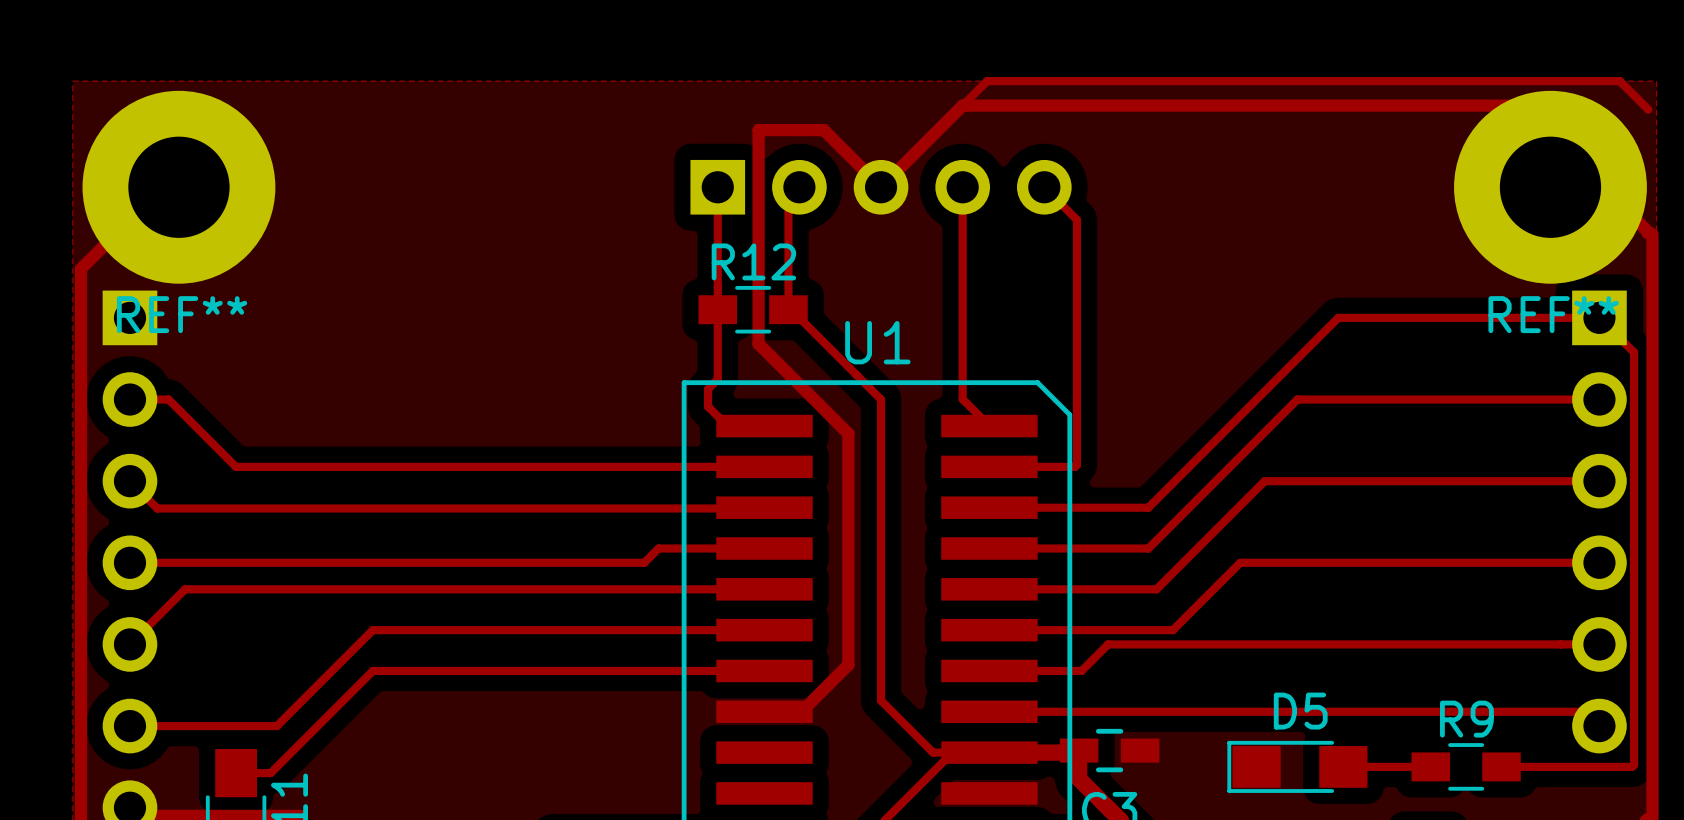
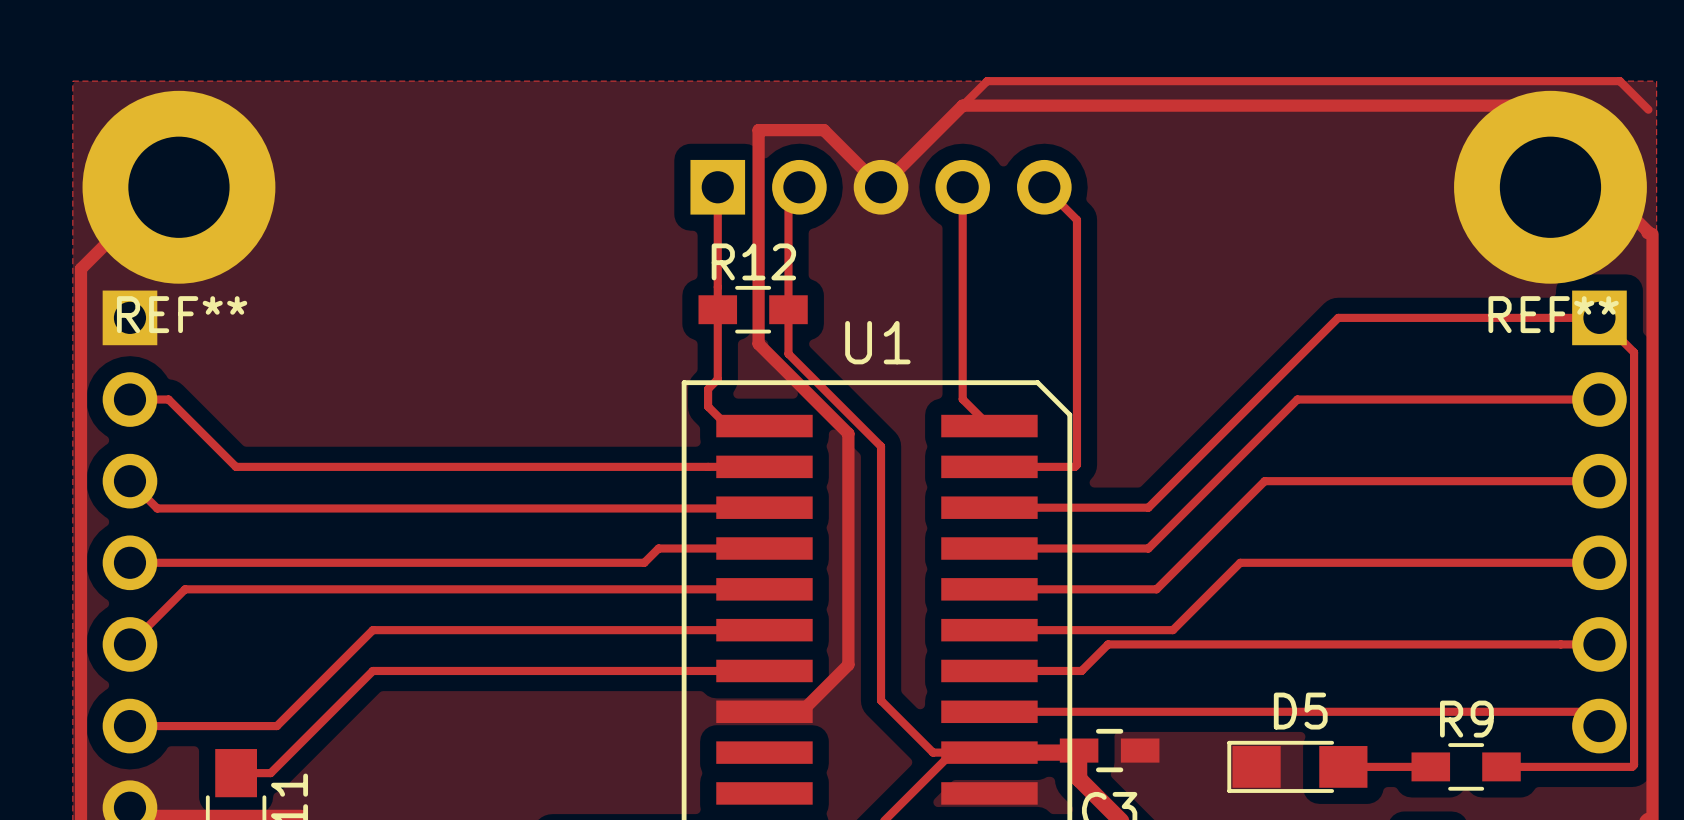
top track: (791, 309) (881, 399) (881, 446) -> (788, 309) (788, 353) (881, 446)

